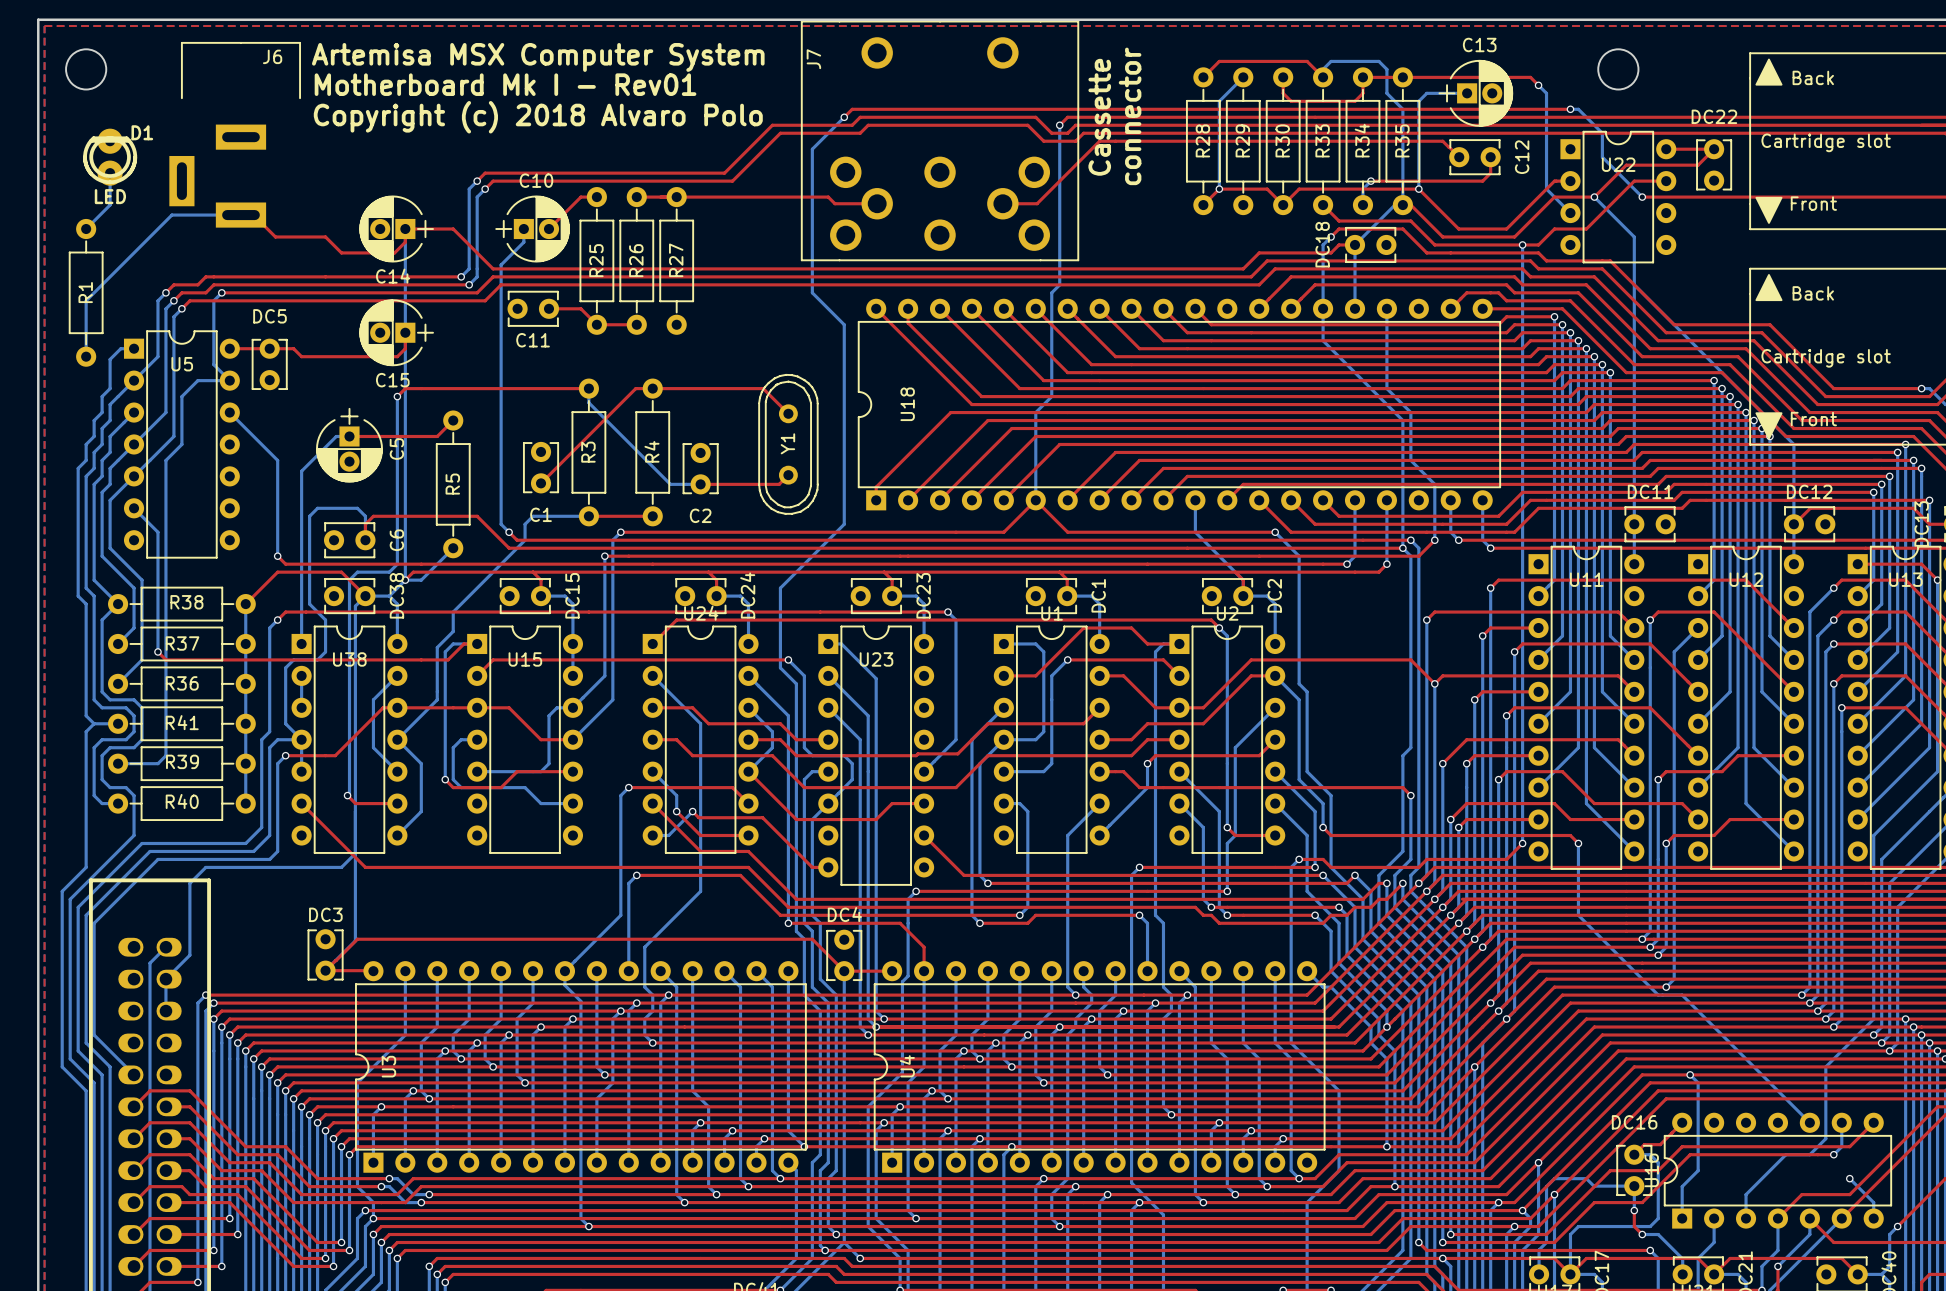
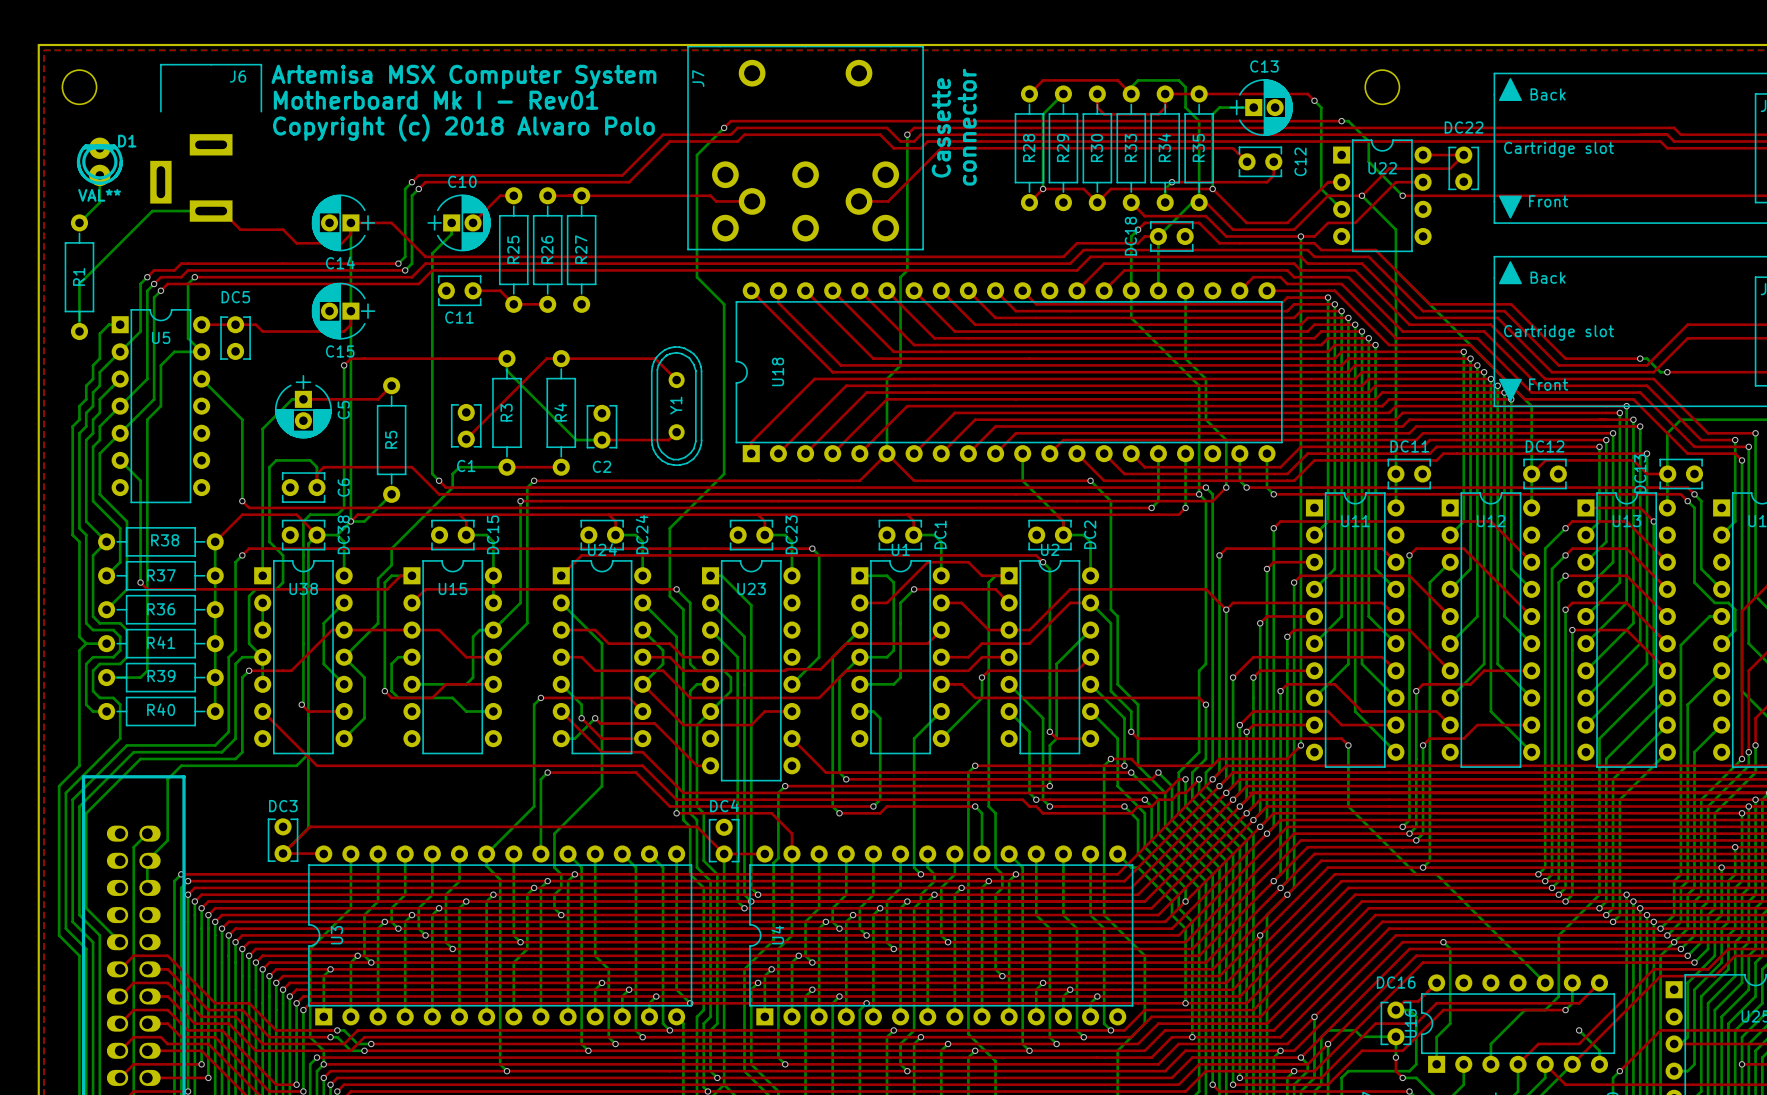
D1 value: LED (110, 196) -> VAL** (99, 195)

